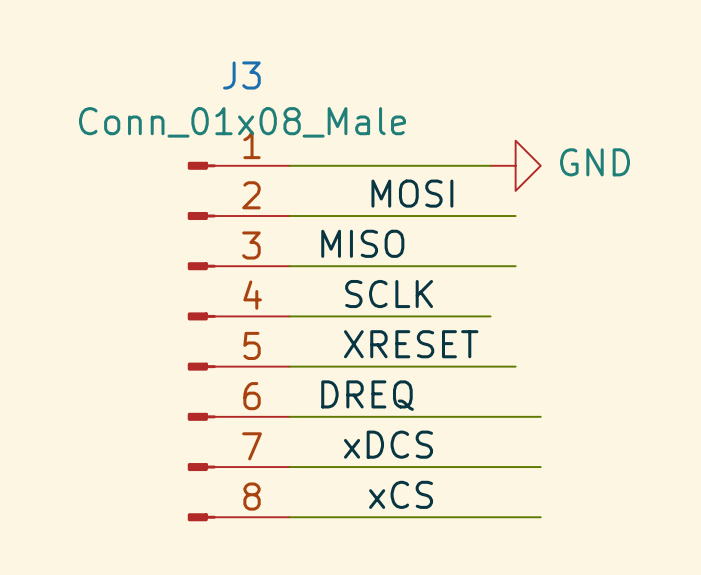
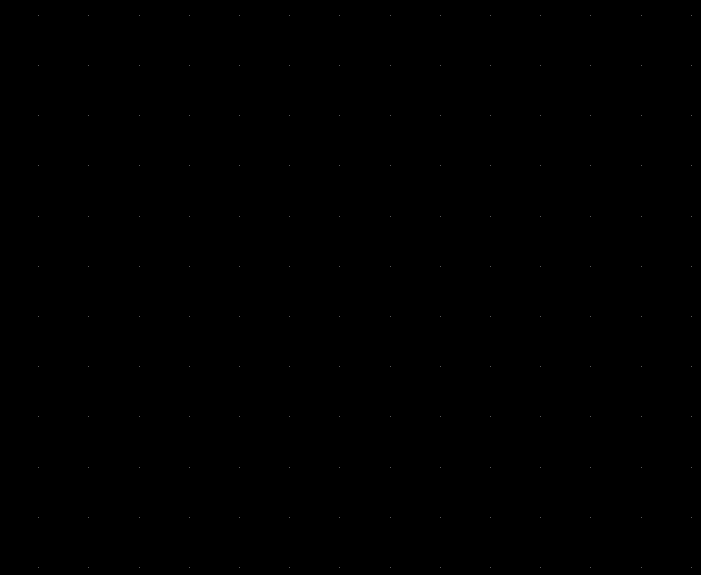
wire: (289, 165) (490, 165) -> none
power symbol: GND (515, 165) -> none
label: MOSI (412, 193) -> none
wire: (289, 216) (515, 216) -> none
label: MISO (362, 243) -> none
wire: (289, 266) (515, 266) -> none
label: SCLK (389, 294) -> none
wire: (289, 316) (490, 316) -> none
J3: Conn_01x08_Male (238, 341) -> none
label: XRESET (411, 344) -> none
wire: (289, 366) (515, 366) -> none
label: DREQ (367, 395) -> none
wire: (289, 416) (540, 416) -> none
label: xDCS (388, 444) -> none
wire: (289, 467) (540, 467) -> none
label: xCS (401, 494) -> none
wire: (289, 517) (540, 517) -> none

